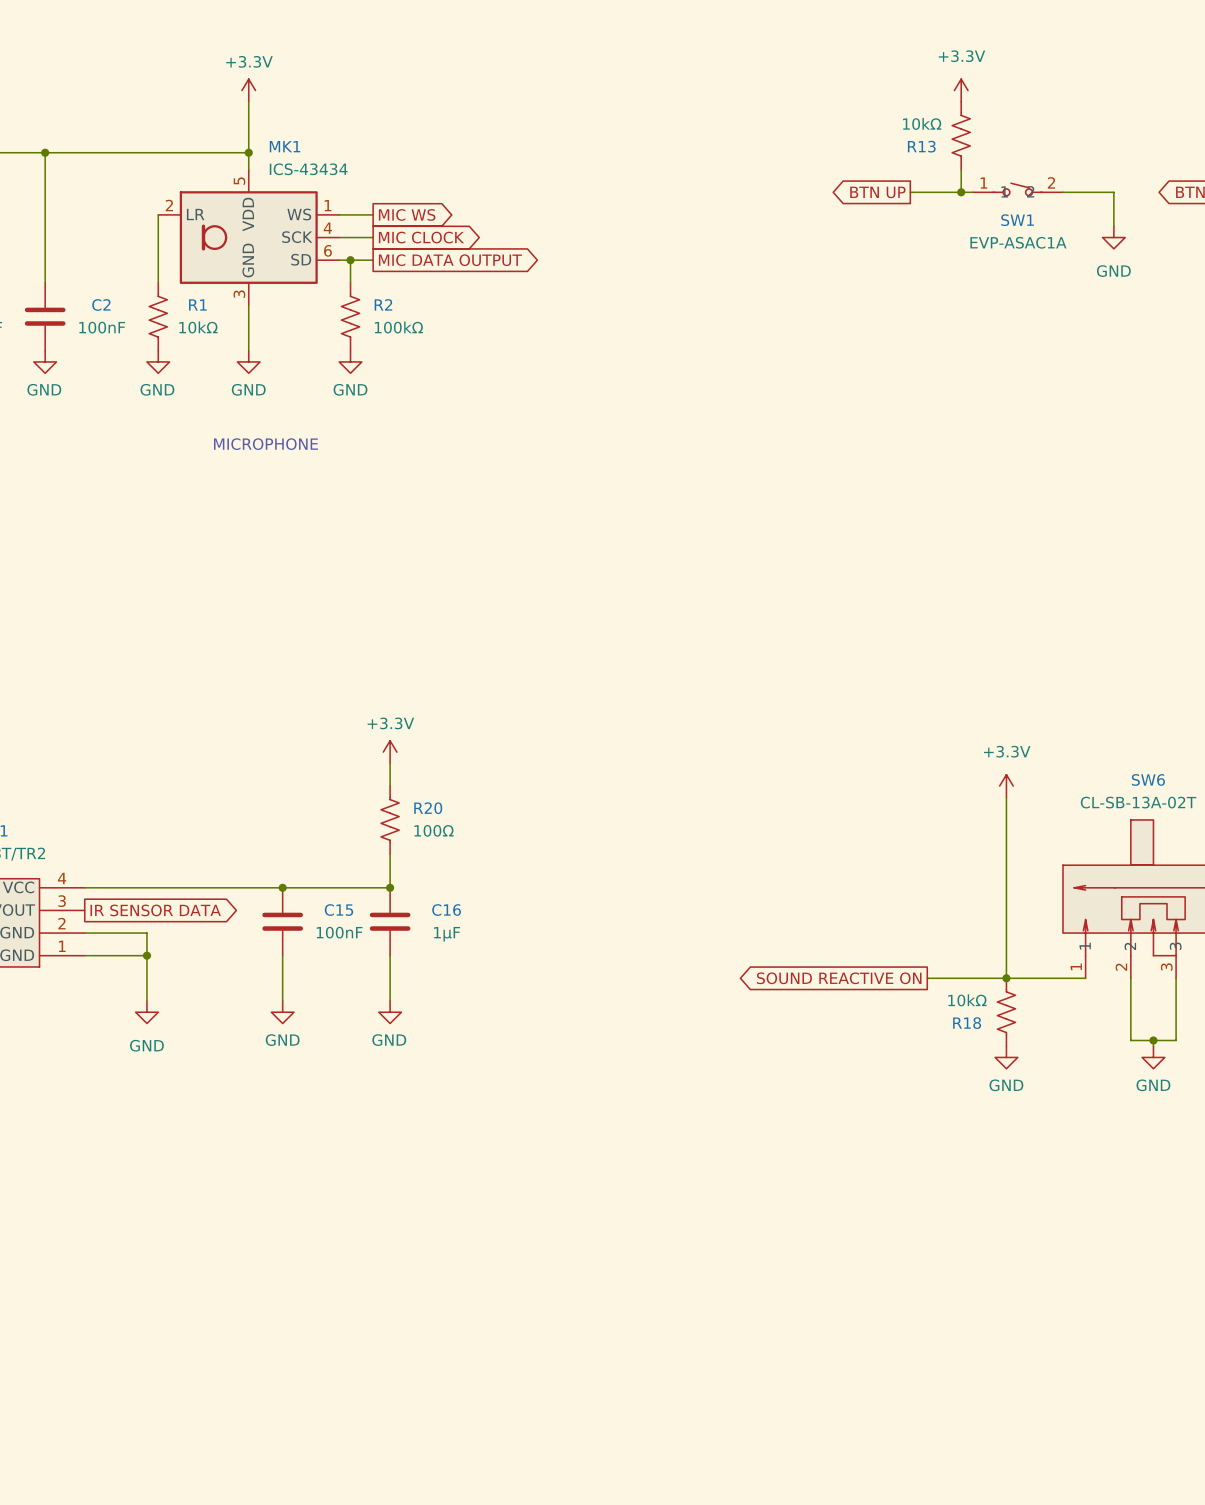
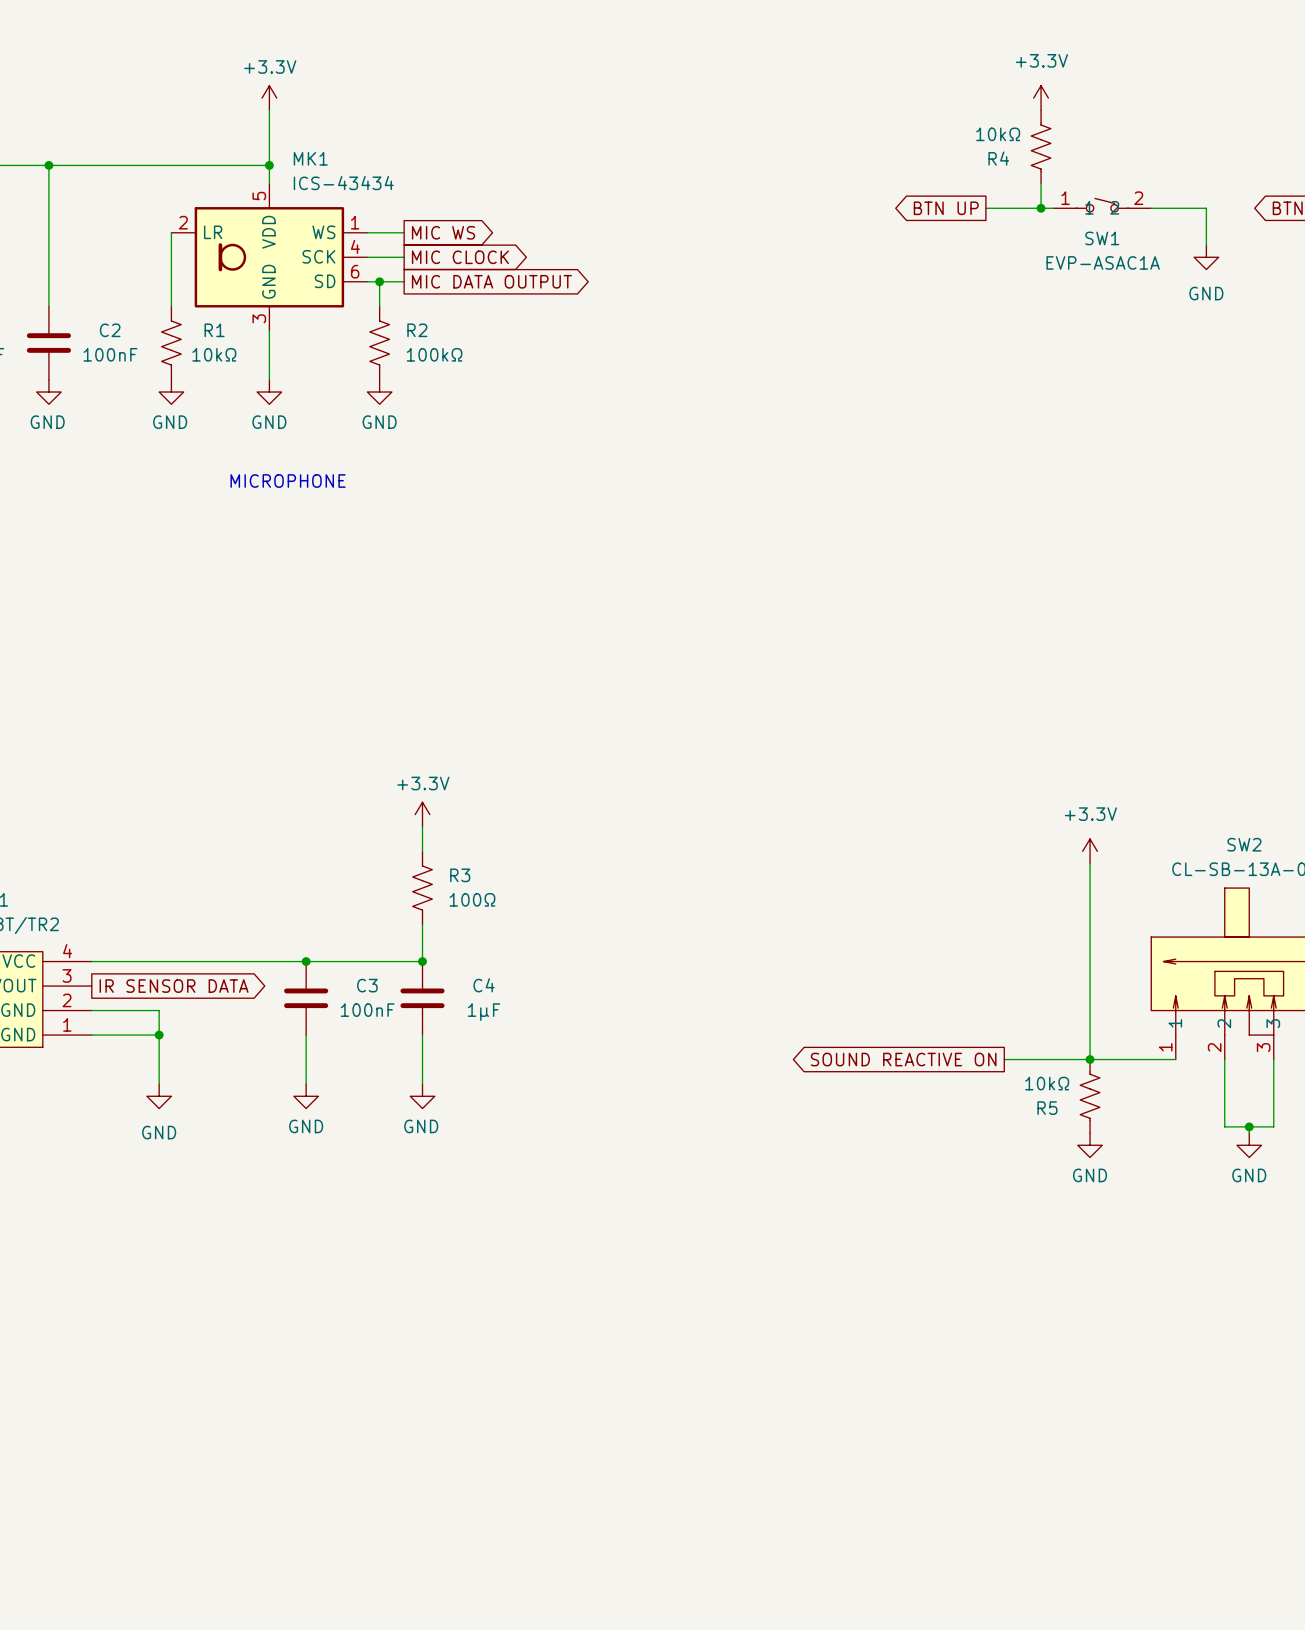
R13 name: R13 (921, 146) -> R4 (998, 158)
SW6 name: SW6 (1148, 779) -> SW2 (1244, 844)
R20 name: R20 (428, 808) -> R3 (460, 875)
C15 name: C15 (338, 910) -> C3 (367, 985)
C16 name: C16 (446, 910) -> C4 (484, 985)
R18 name: R18 (967, 1023) -> R5 (1047, 1108)

